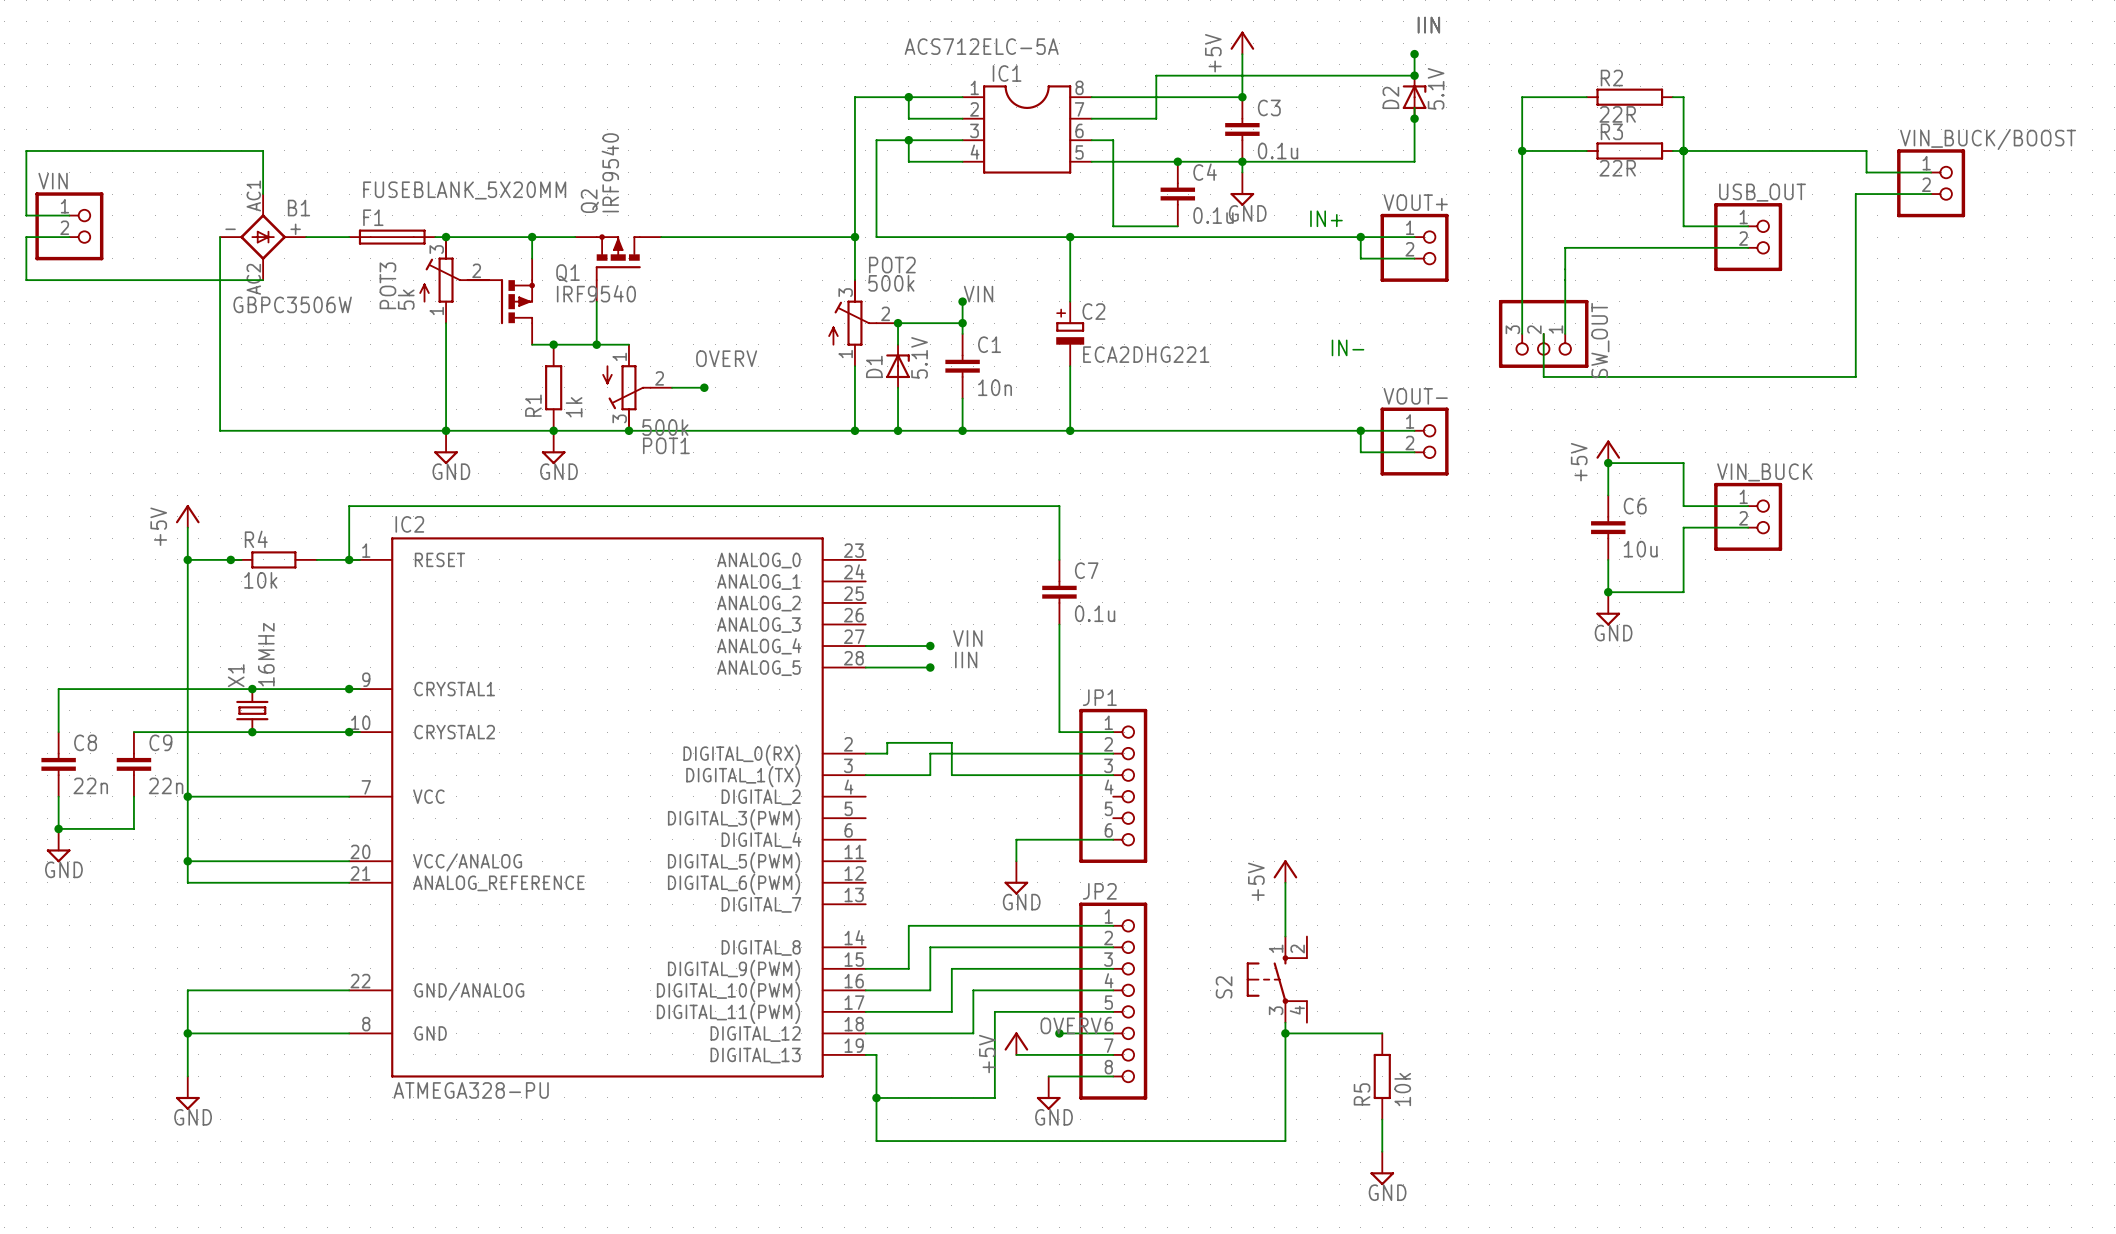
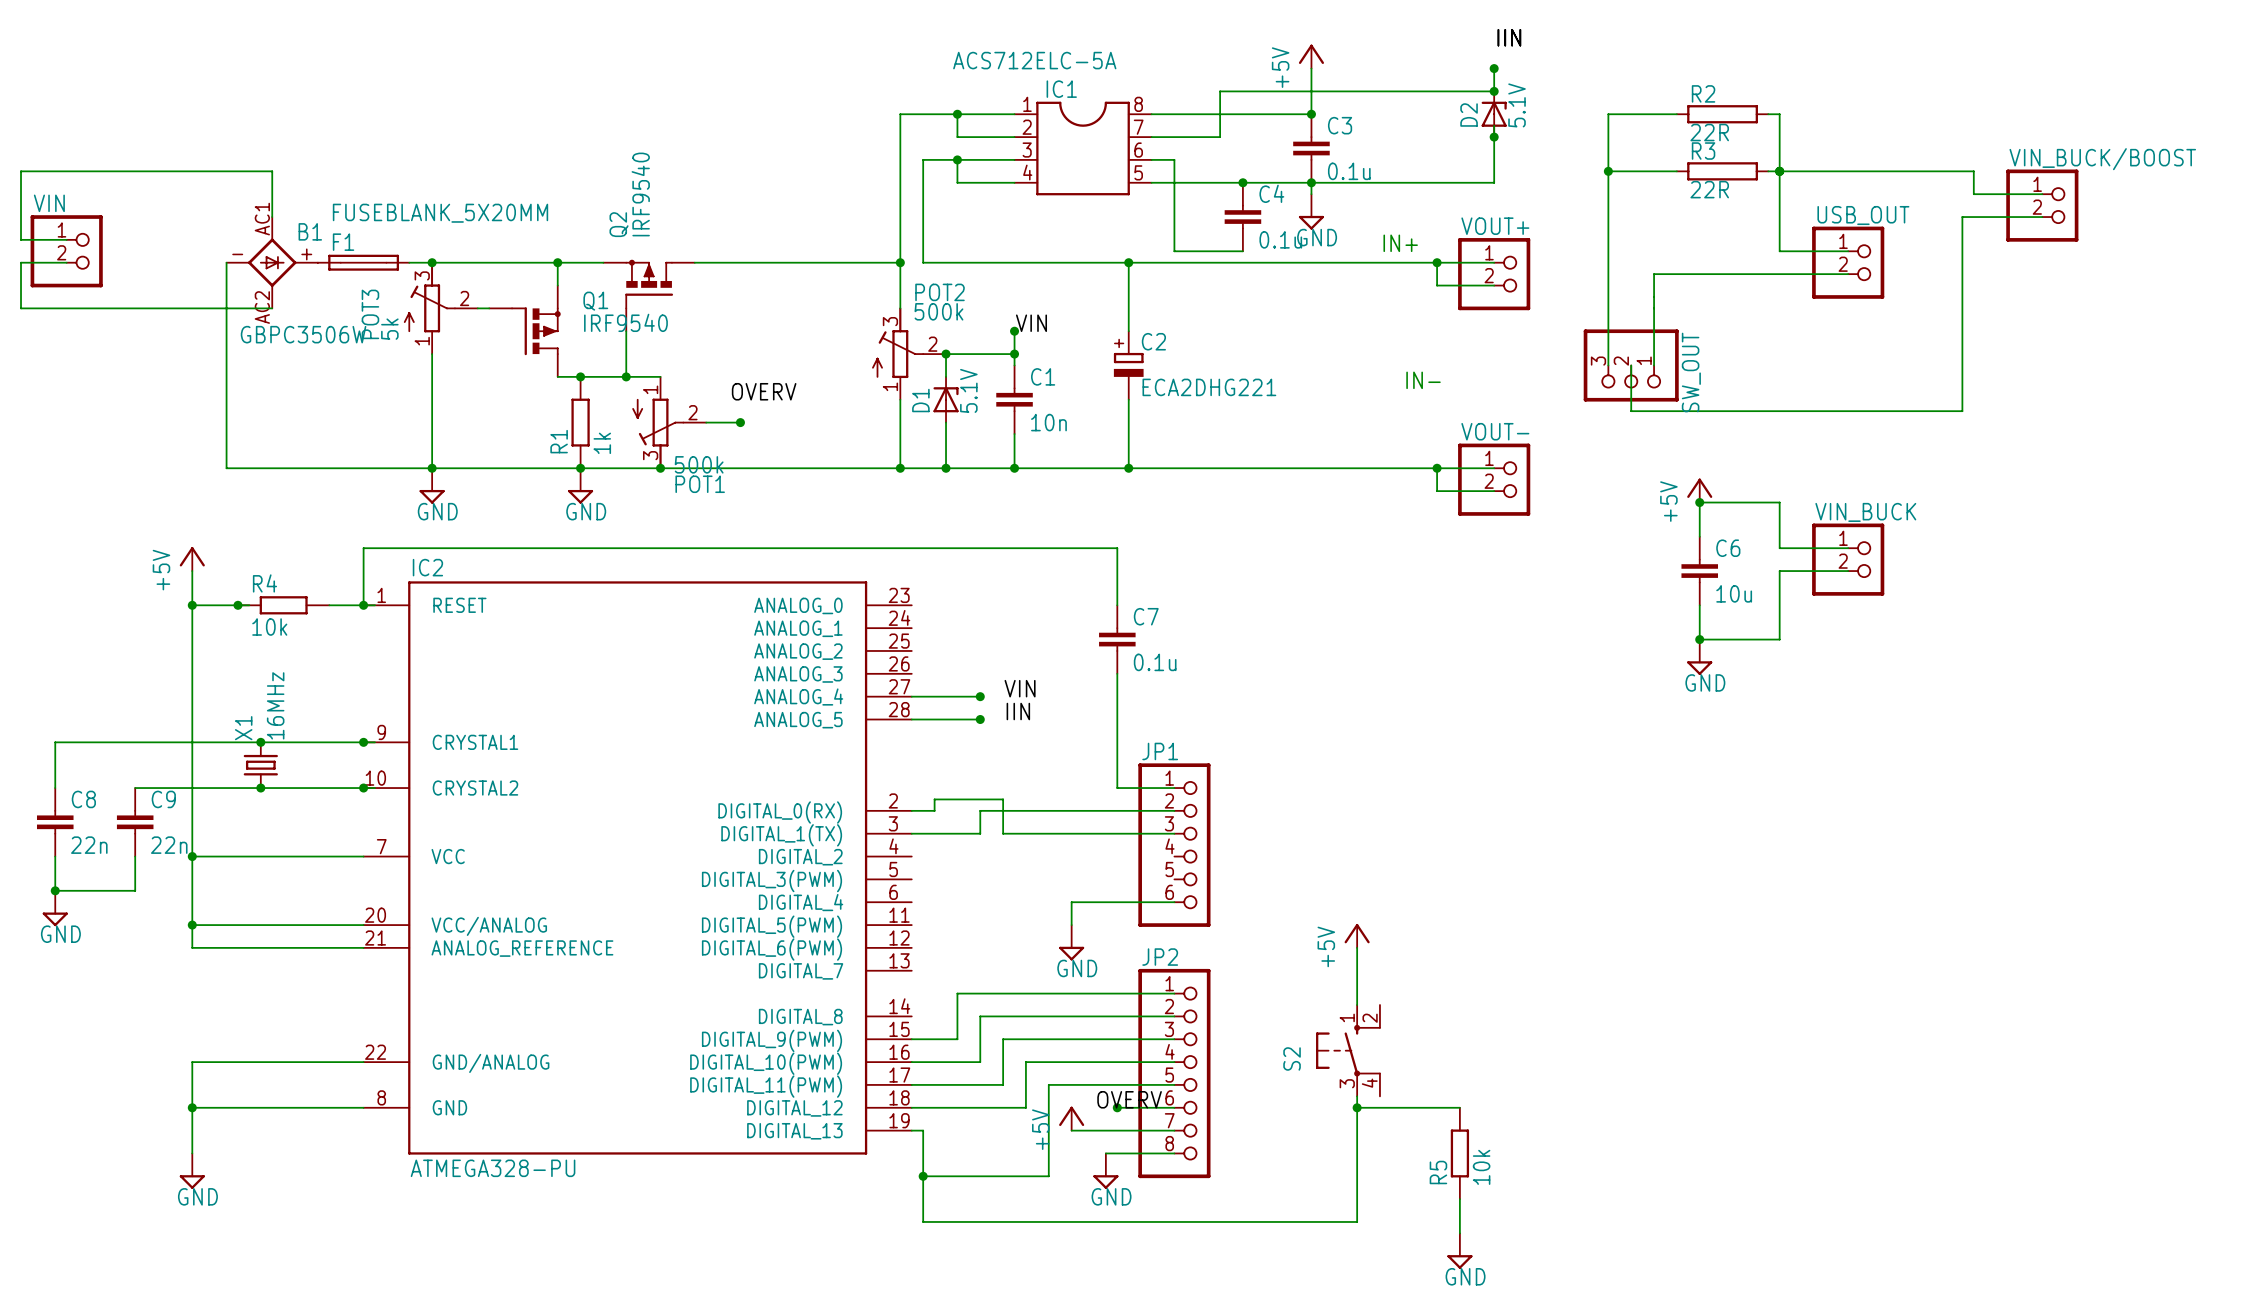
F1 position: (392, 237) -> (363, 262)
junction position: (446, 237) -> (432, 262)
POT3 position: (454, 279) -> (440, 308)
wire: (446, 323) (446, 430) -> (432, 354) (432, 468)
junction position: (446, 430) -> (432, 468)
power symbol position: GND (446, 447) -> GND (432, 485)

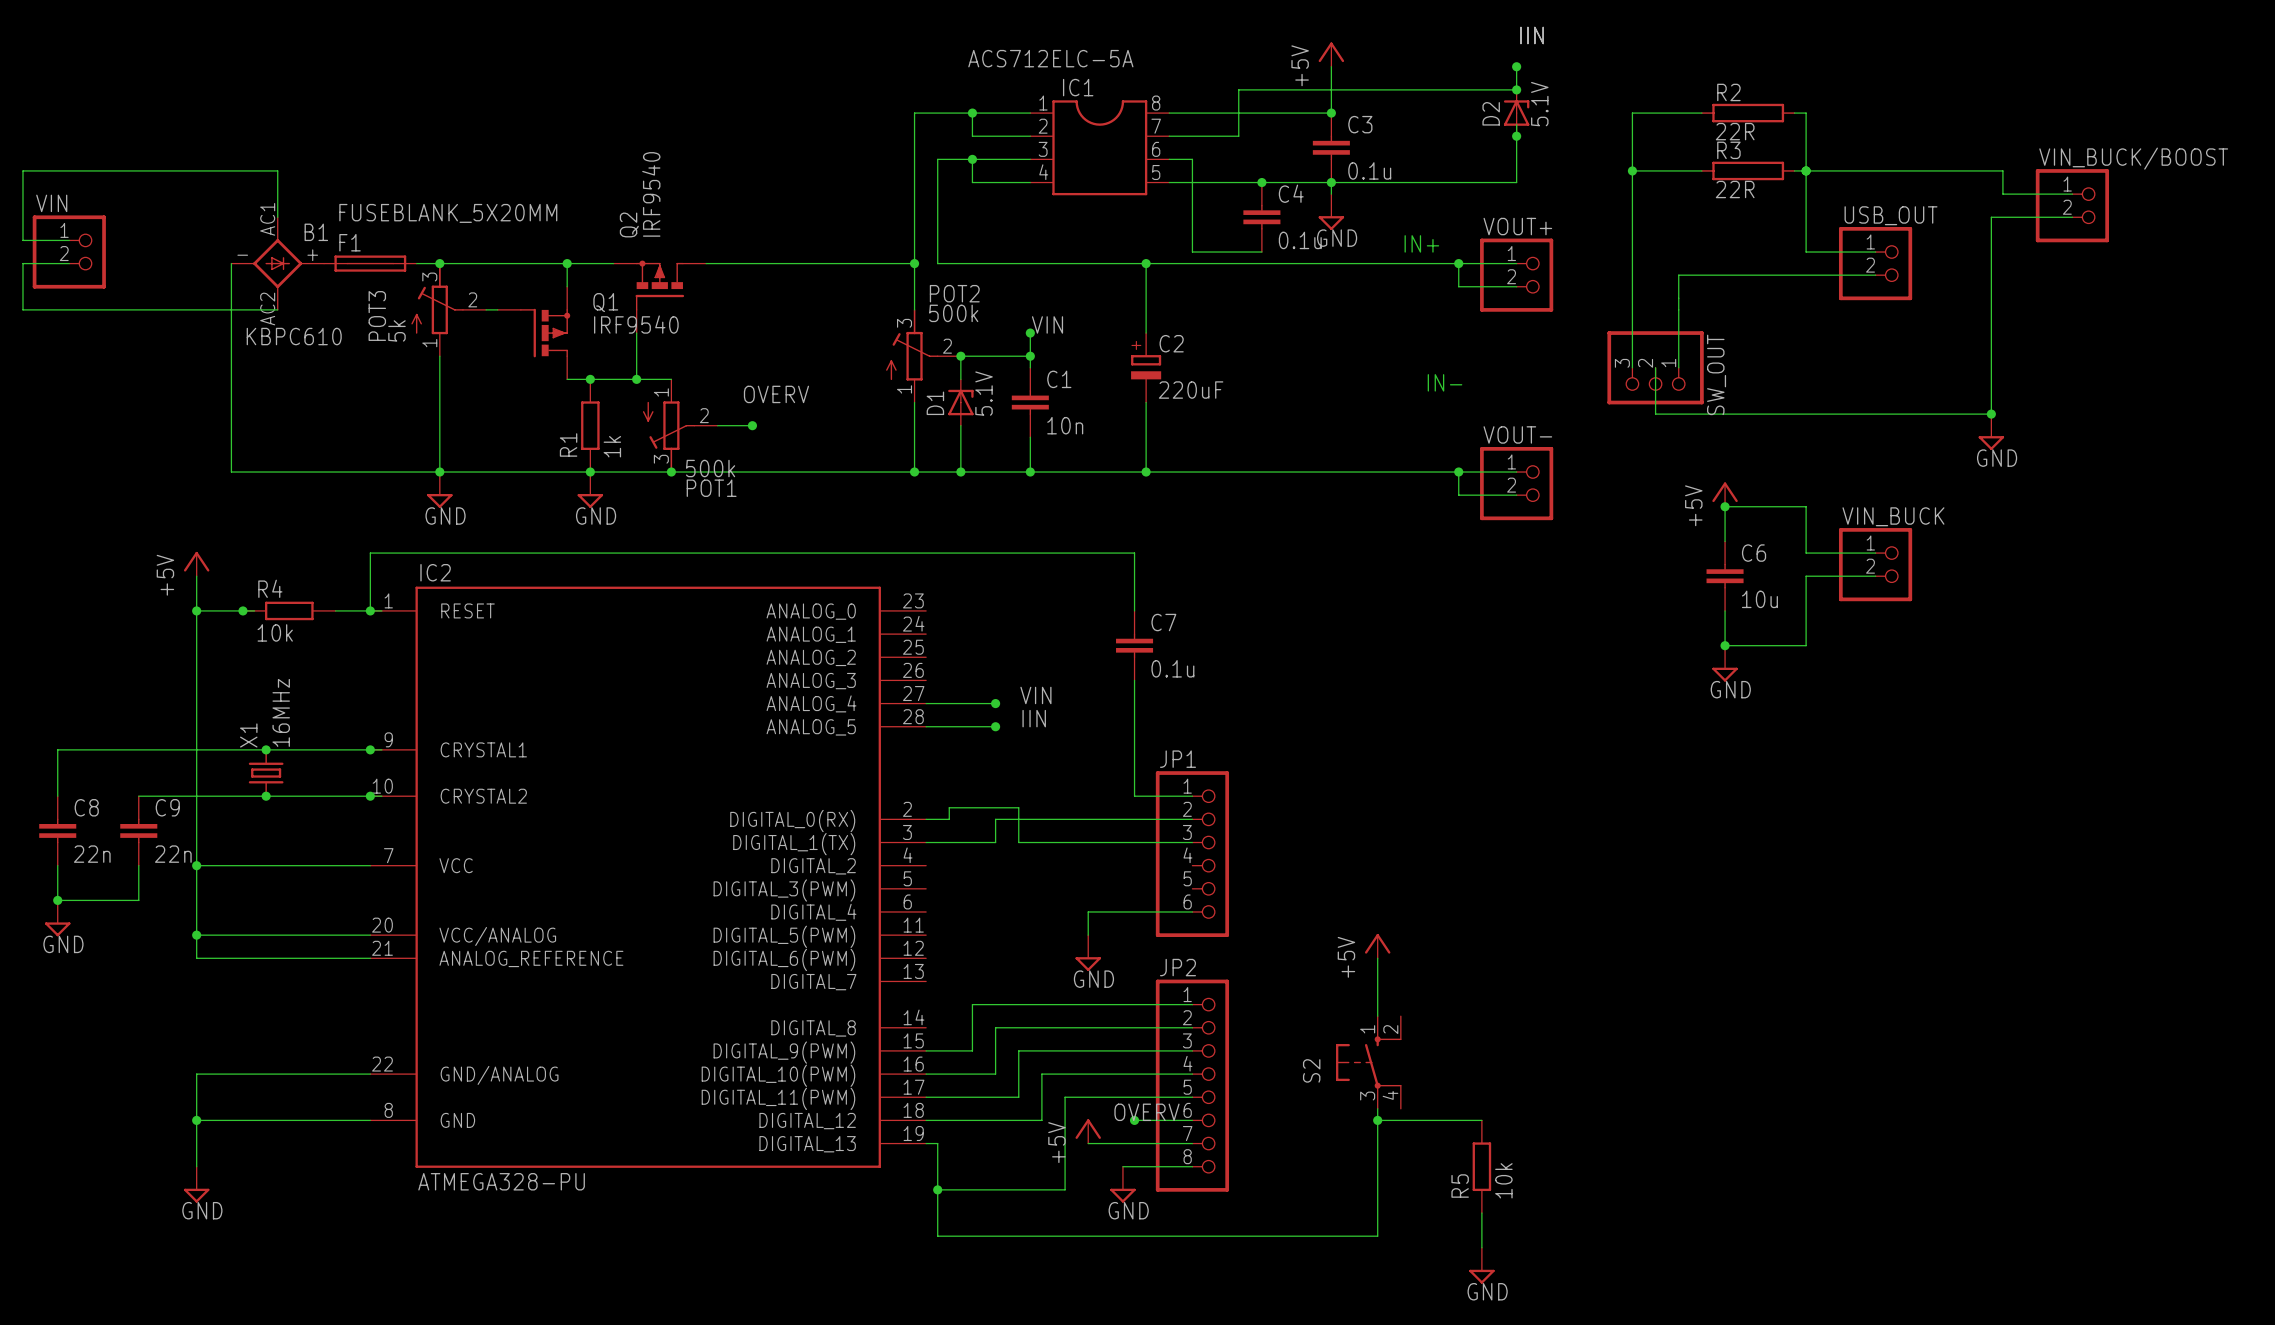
B1 value: GBPC3506W (303, 334) -> KBPC610 (294, 336)
C2 value: ECA2DHG221 (1209, 387) -> 220uF (1191, 390)
junction: none -> (1991, 414)
power symbol: none -> GND (1991, 432)

